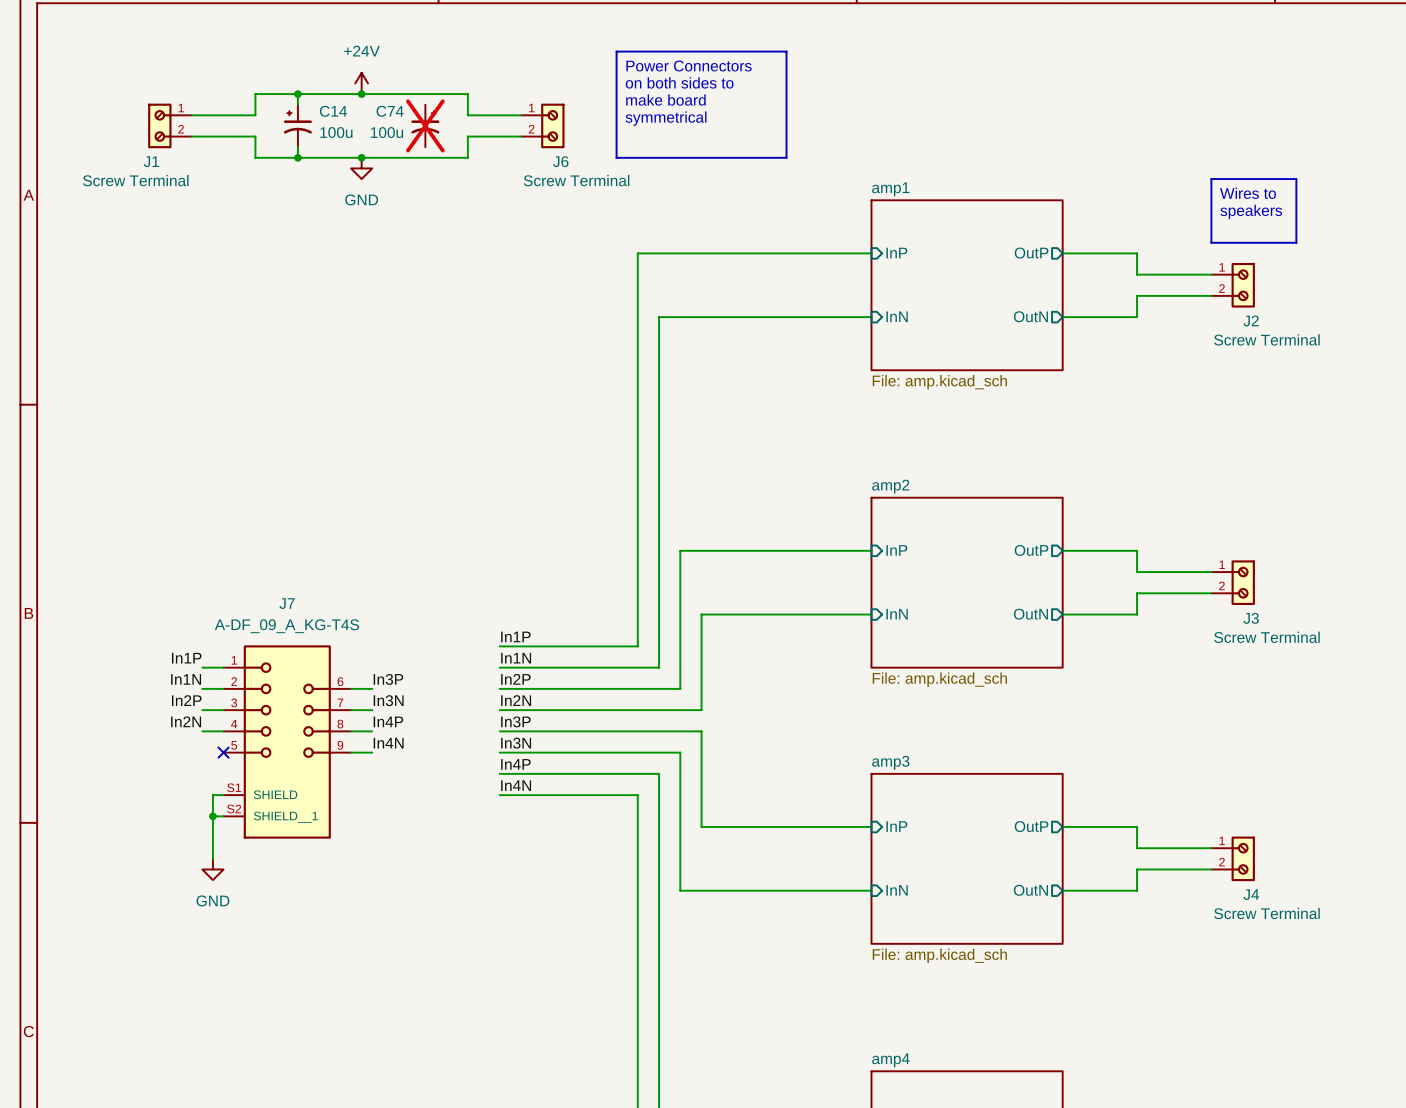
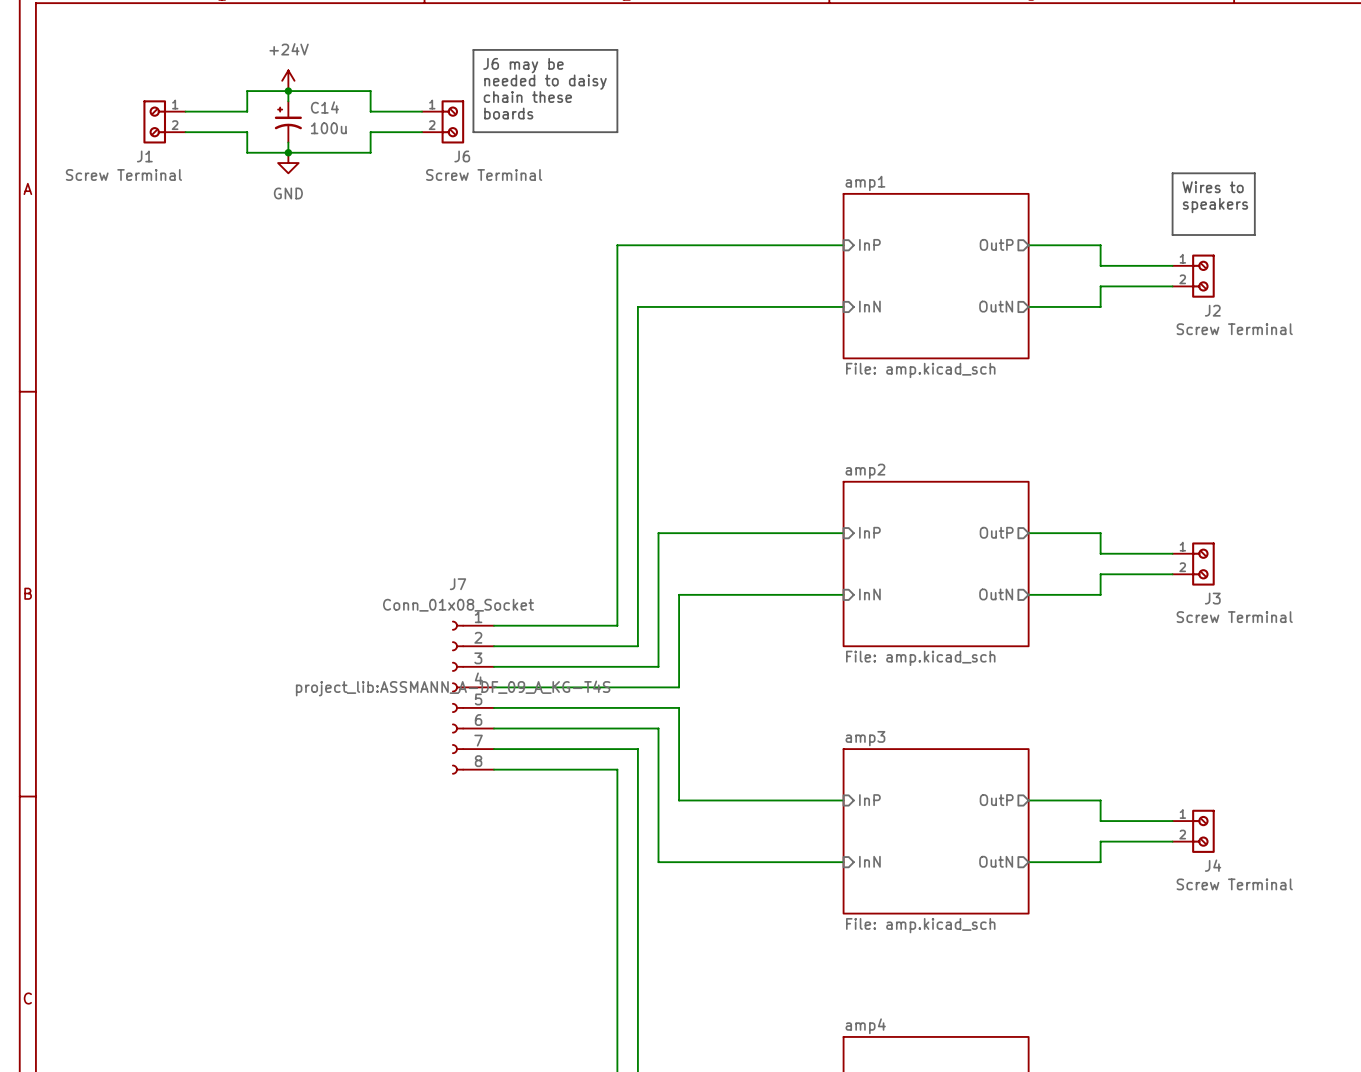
line: (616, 51) (616, 157) (786, 157) (786, 51) (637, 51) -> (596, 49) (473, 49) (473, 132) (617, 132) (617, 49)
text: Power Connectors (689, 66) -> none
text: none -> J6 may be (523, 65)
text: on both sides to (679, 82) -> none
power symbol position: +24V (361, 83) -> +24V (288, 80)
text: none -> needed to daisy (545, 82)
junction: (361, 94) -> none
wire: (382, 94) (467, 94) (467, 115) (520, 115) -> (370, 91) (370, 111) (422, 111)
text: none -> chain these (527, 97)
text: make board (665, 100) -> none
text: none -> boards (508, 113)
text: symmetrical (666, 118) -> none
C74: 100u (425, 125) -> none
J6 position: (542, 125) -> (443, 121)
wire: (520, 136) (467, 136) (467, 157) (382, 157) -> (422, 132) (370, 132) (370, 152)
junction: (361, 157) -> none
power symbol position: GND (361, 168) -> GND (288, 163)
J7 name position: J7 (287, 603) -> J7 (458, 584)
J7 value: A-DF_09_A_KG-T4S (286, 626) -> Conn_01x08_Socket (458, 605)
label: In1P (515, 636) -> none
J7 symbol: [223, 645, 352, 839] -> [452, 620, 495, 775]
label: In1P (186, 658) -> none
label: In1N (516, 658) -> none
wire: (202, 667) (223, 667) -> none
label: In1N (186, 679) -> none
label: In3P (388, 679) -> none
label: In2P (515, 679) -> none
wire: (202, 688) (223, 688) -> none
wire: (351, 688) (372, 688) -> none
label: In2P (186, 700) -> none
label: In3N (388, 700) -> none
label: In2N (516, 700) -> none
wire: (202, 710) (223, 710) -> none
wire: (351, 710) (372, 710) -> none
J7 text: none -> project_lib:ASSMANN_A-DF_09_A_KG-T4S (453, 688)
label: In2N (186, 721) -> none
label: In4P (388, 721) -> none
label: In3P (515, 721) -> none
wire: (202, 731) (223, 731) -> none
wire: (351, 731) (372, 731) -> none
label: In4N (388, 743) -> none
label: In3N (516, 743) -> none
no-connect mark: (223, 752) -> none
wire: (351, 752) (372, 752) -> none
label: In4P (515, 764) -> none
label: In4N (516, 785) -> none
wire: (223, 795) (212, 795) (212, 858) -> none
wire: (212, 816) (223, 816) -> none
junction: (212, 816) -> none
power symbol: GND (212, 869) -> none

